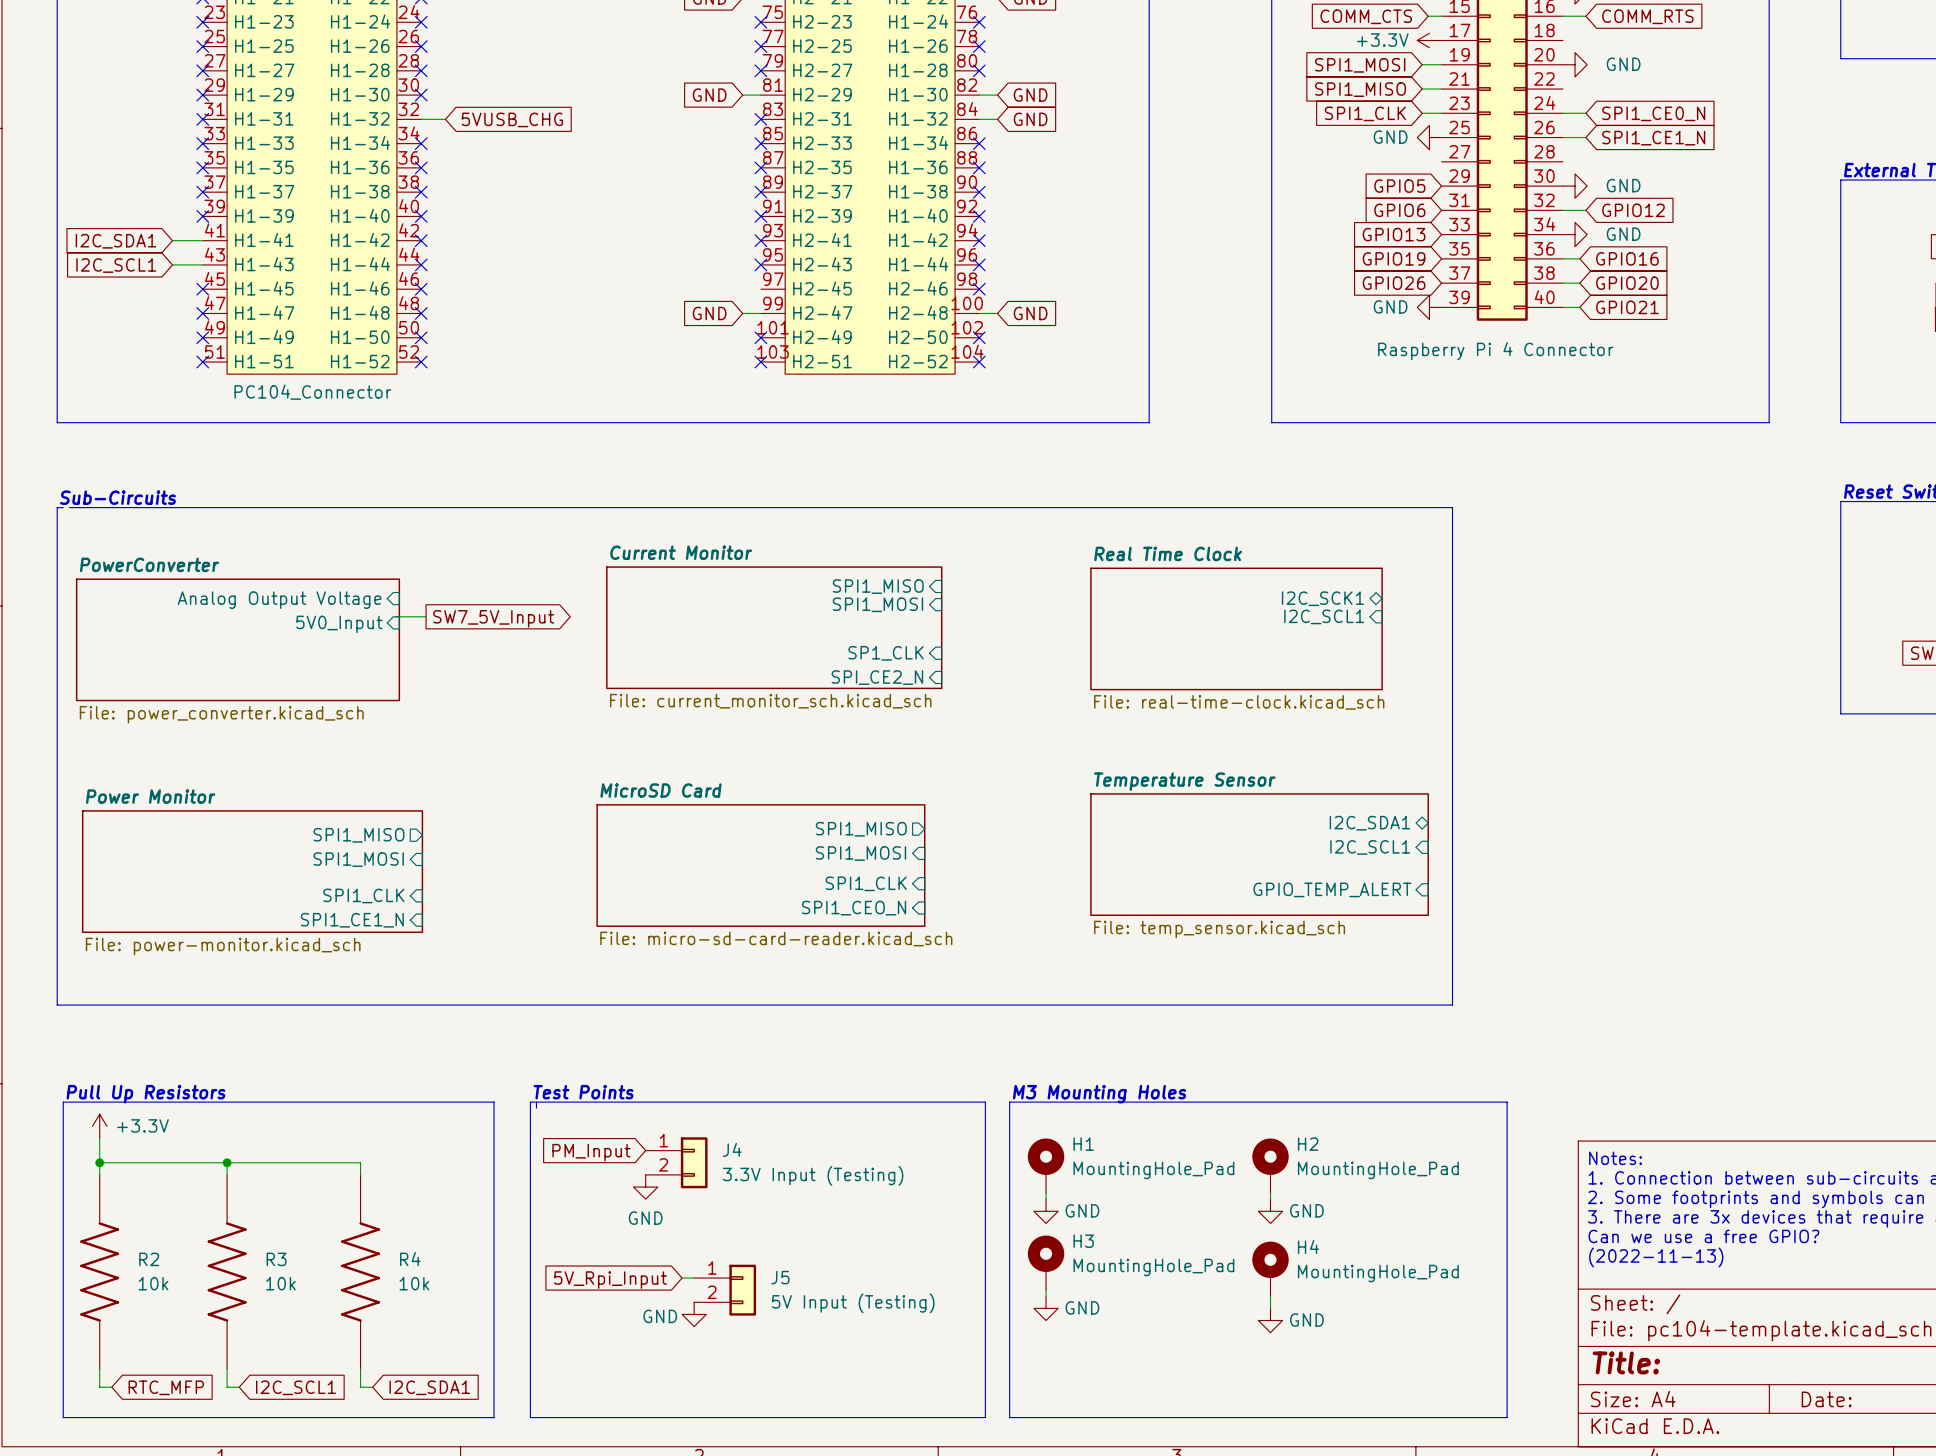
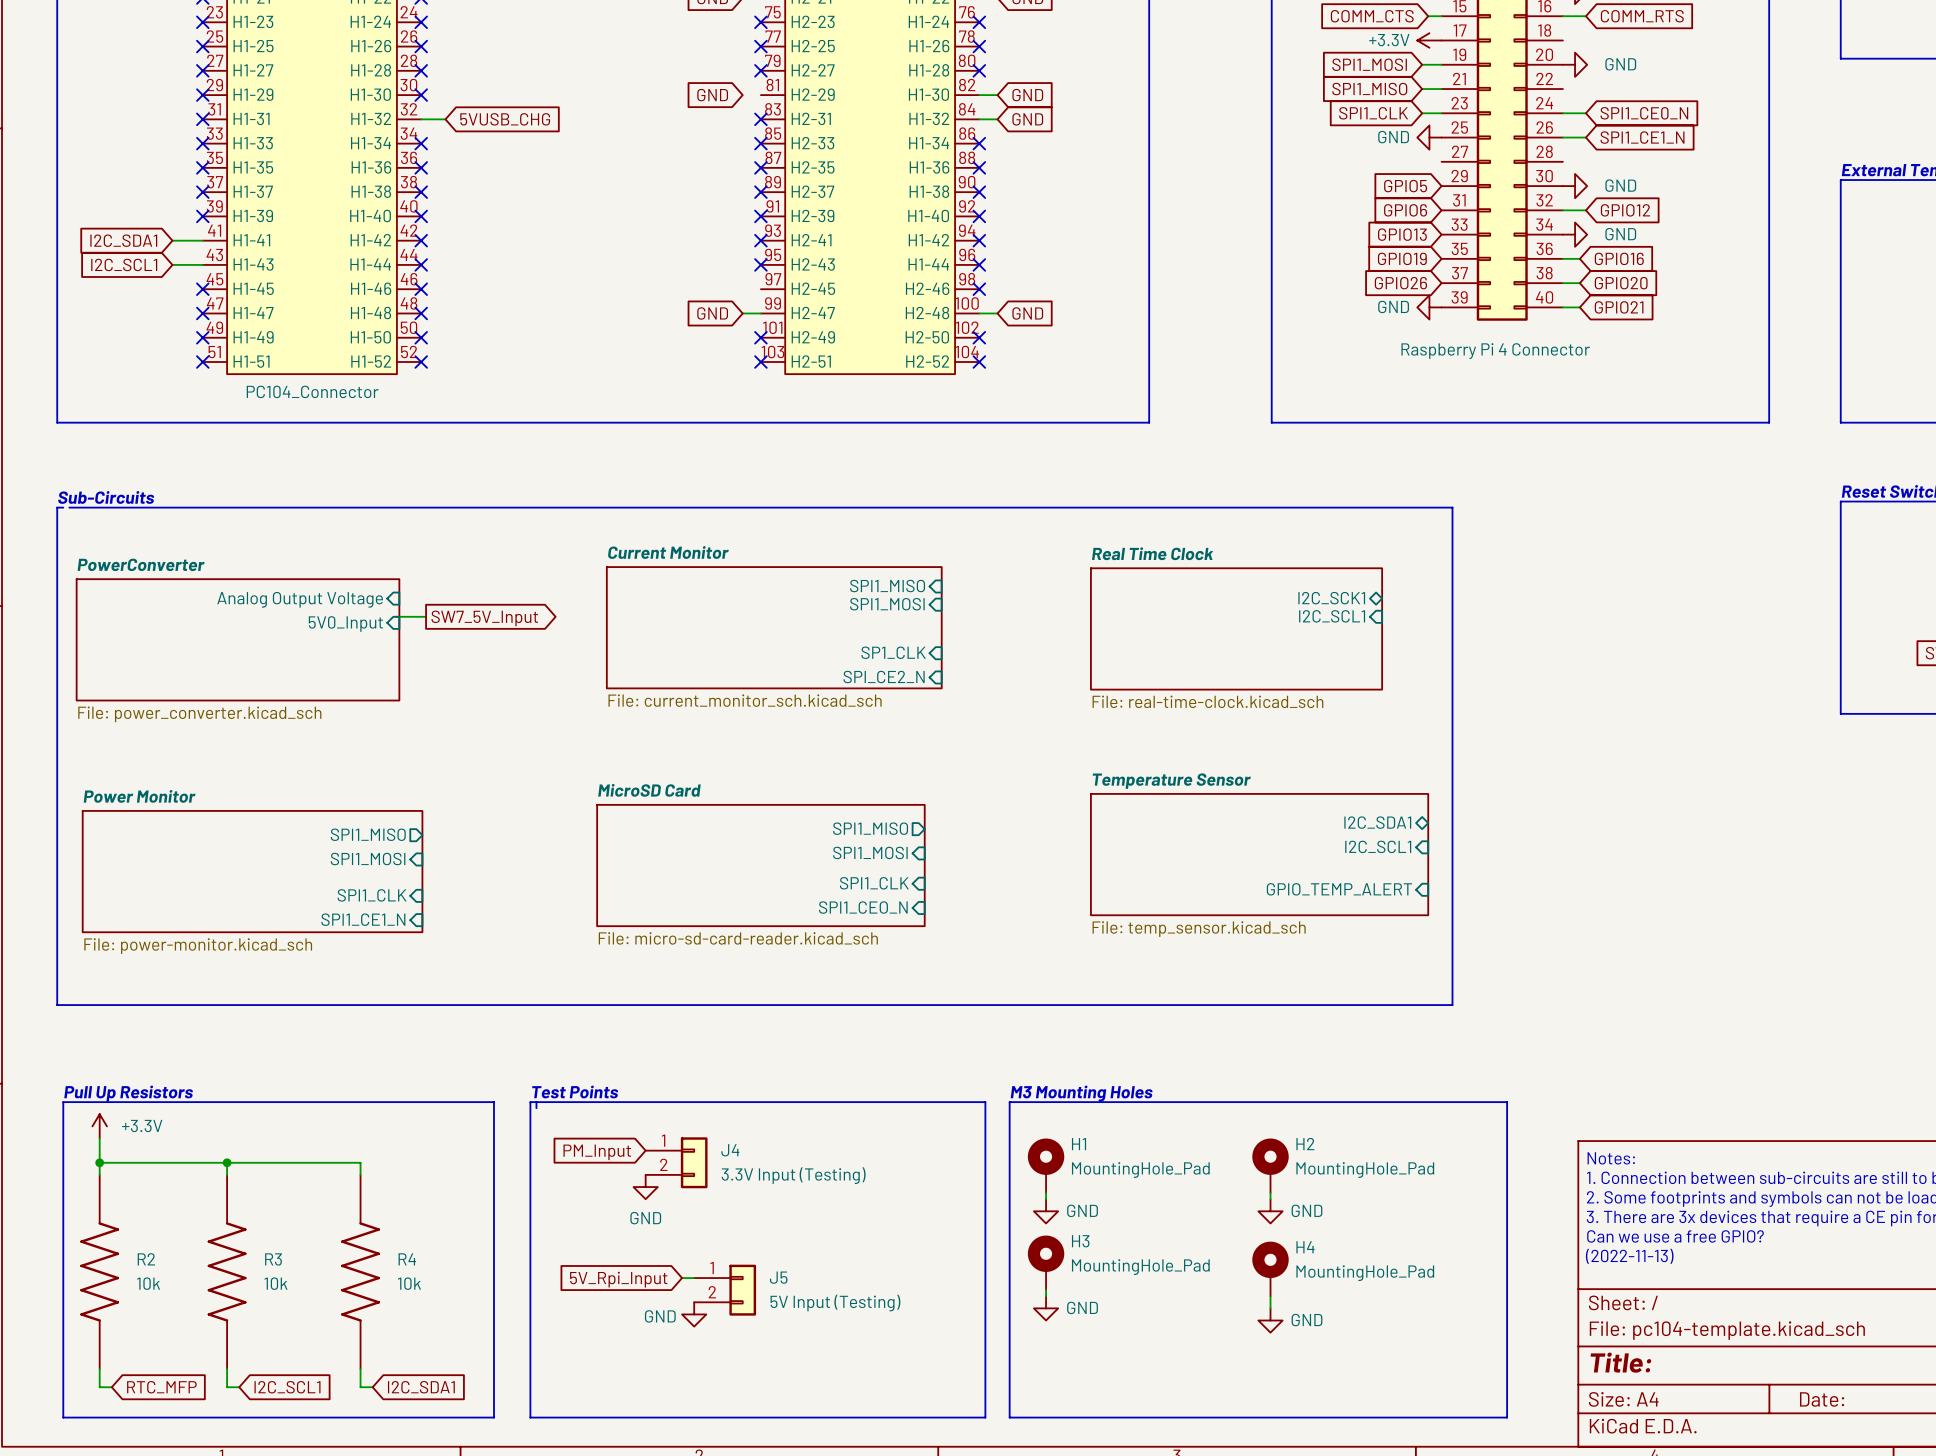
wire: (742, 95) (760, 95) -> none

